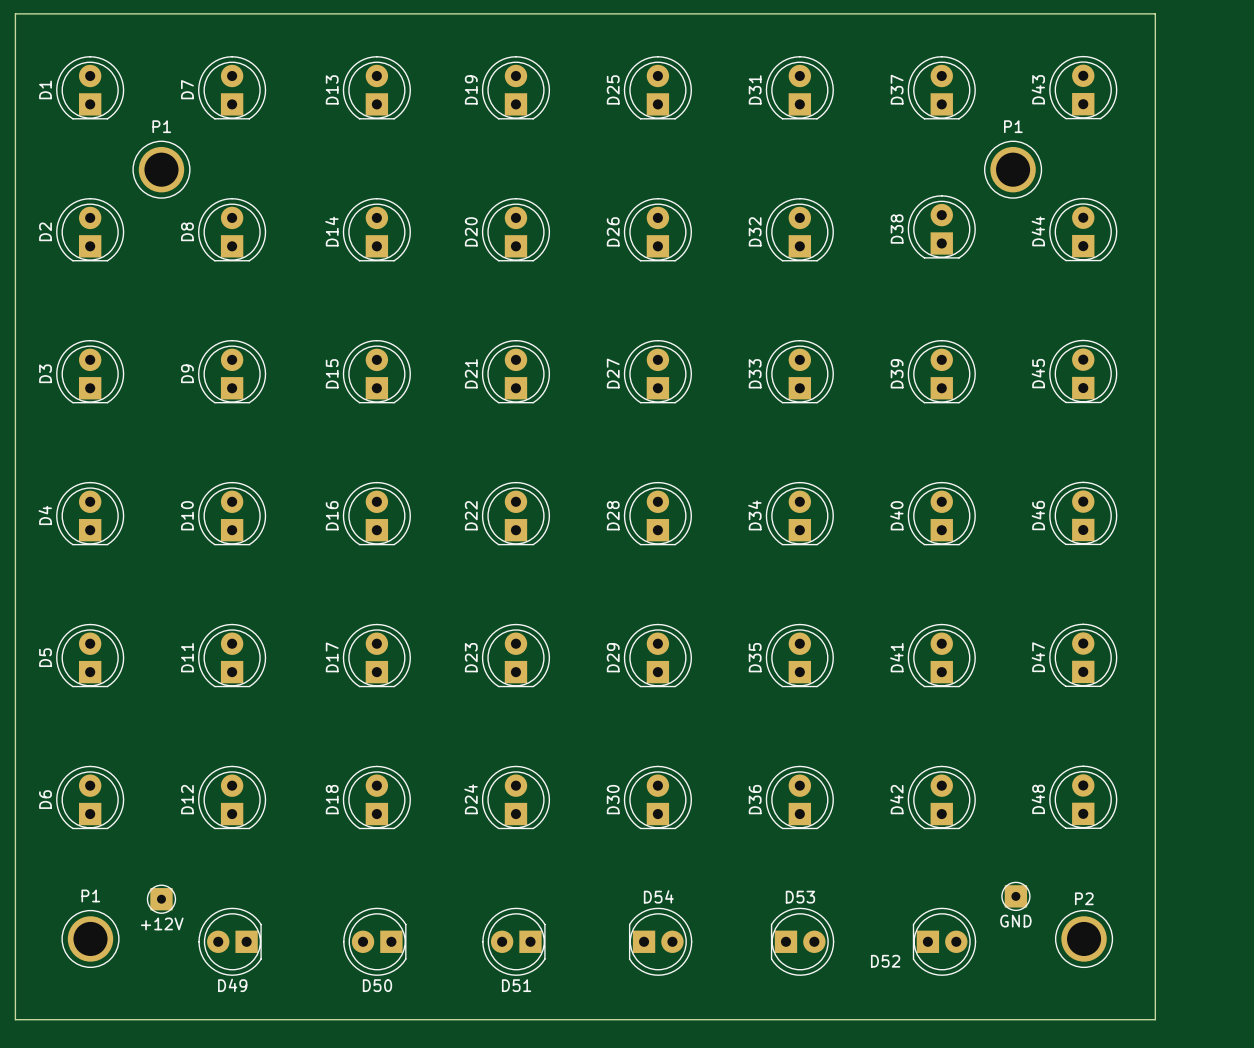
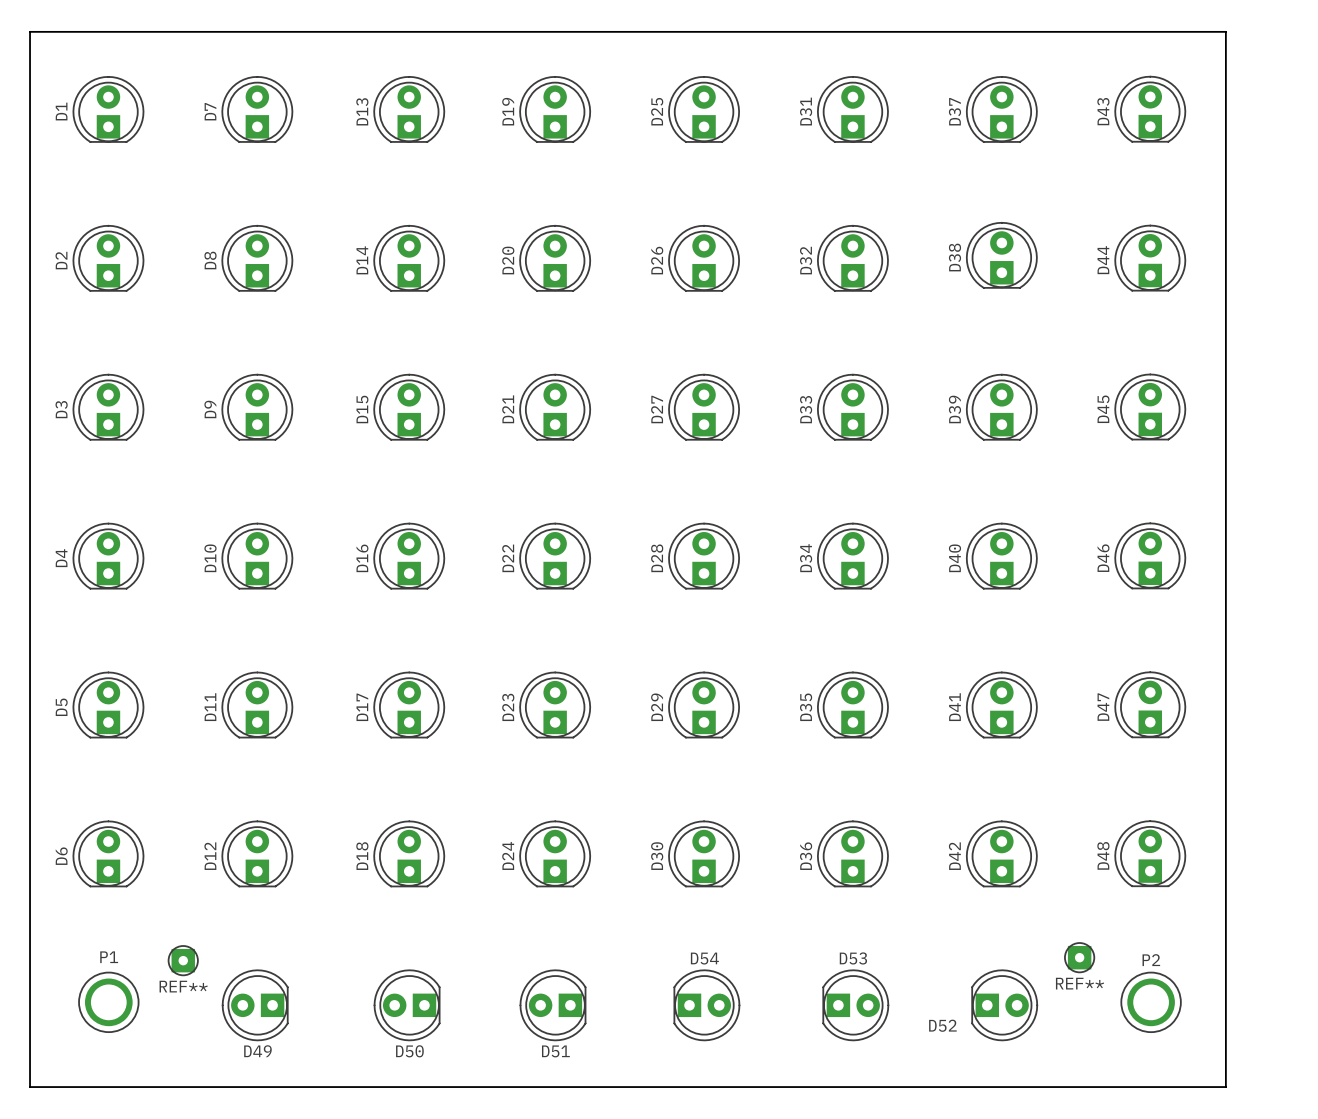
P1: (161, 169) -> none
P1: (1013, 169) -> none
GND name: GND (1015, 921) -> REF** (1080, 983)
+12V name: +12V (162, 923) -> REF** (183, 986)

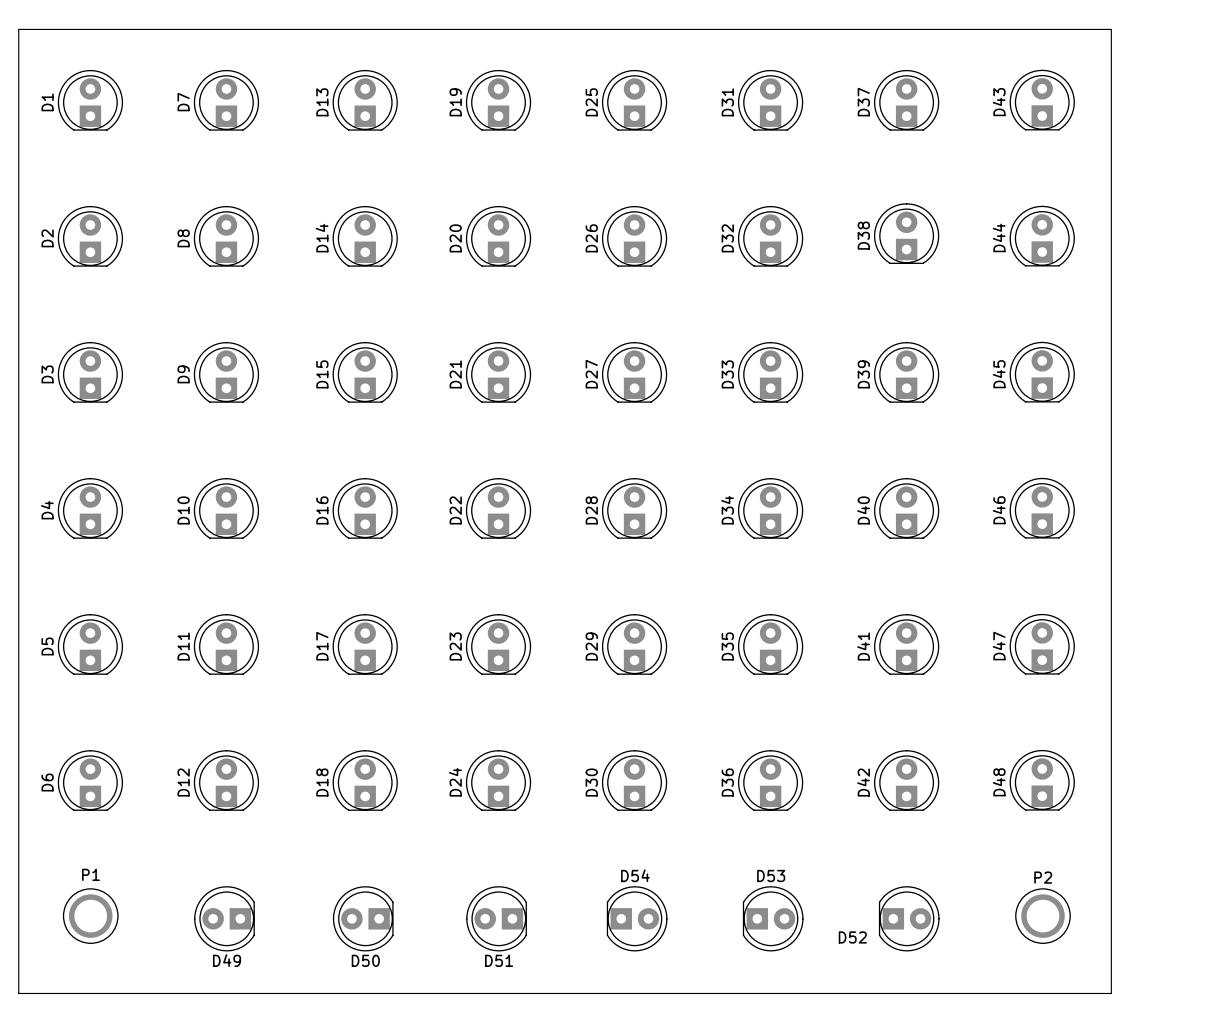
REF**: (1079, 957) -> none
REF**: (183, 960) -> none

